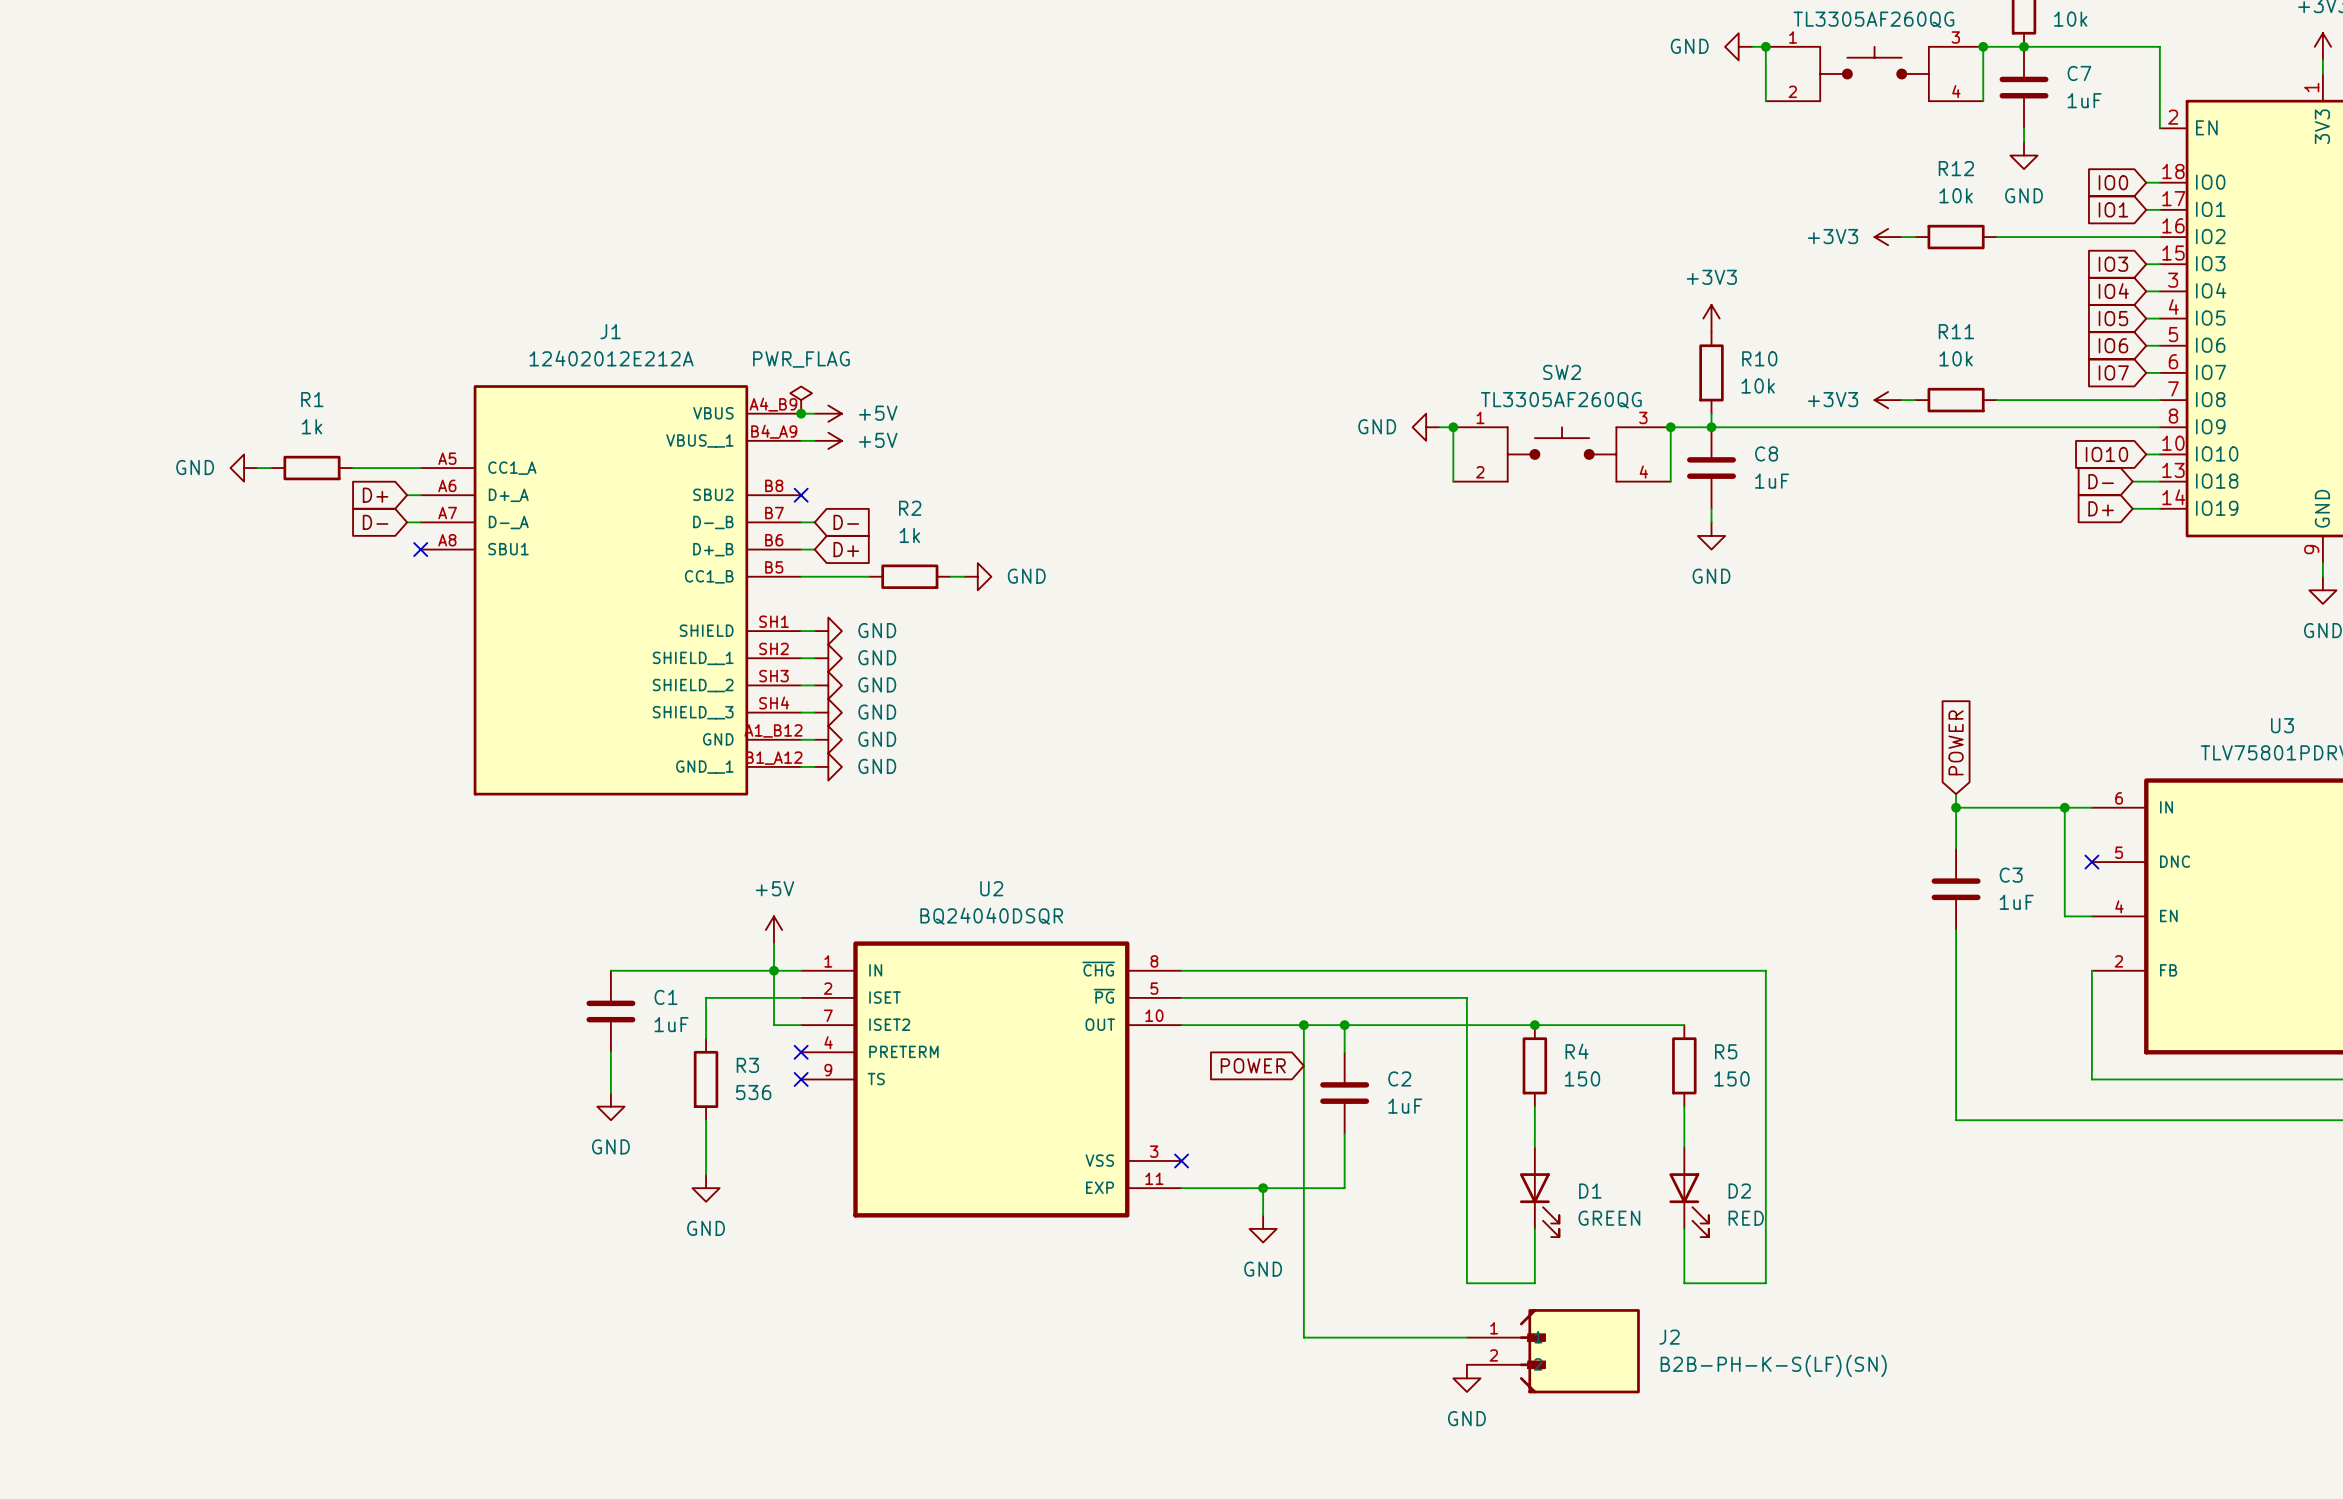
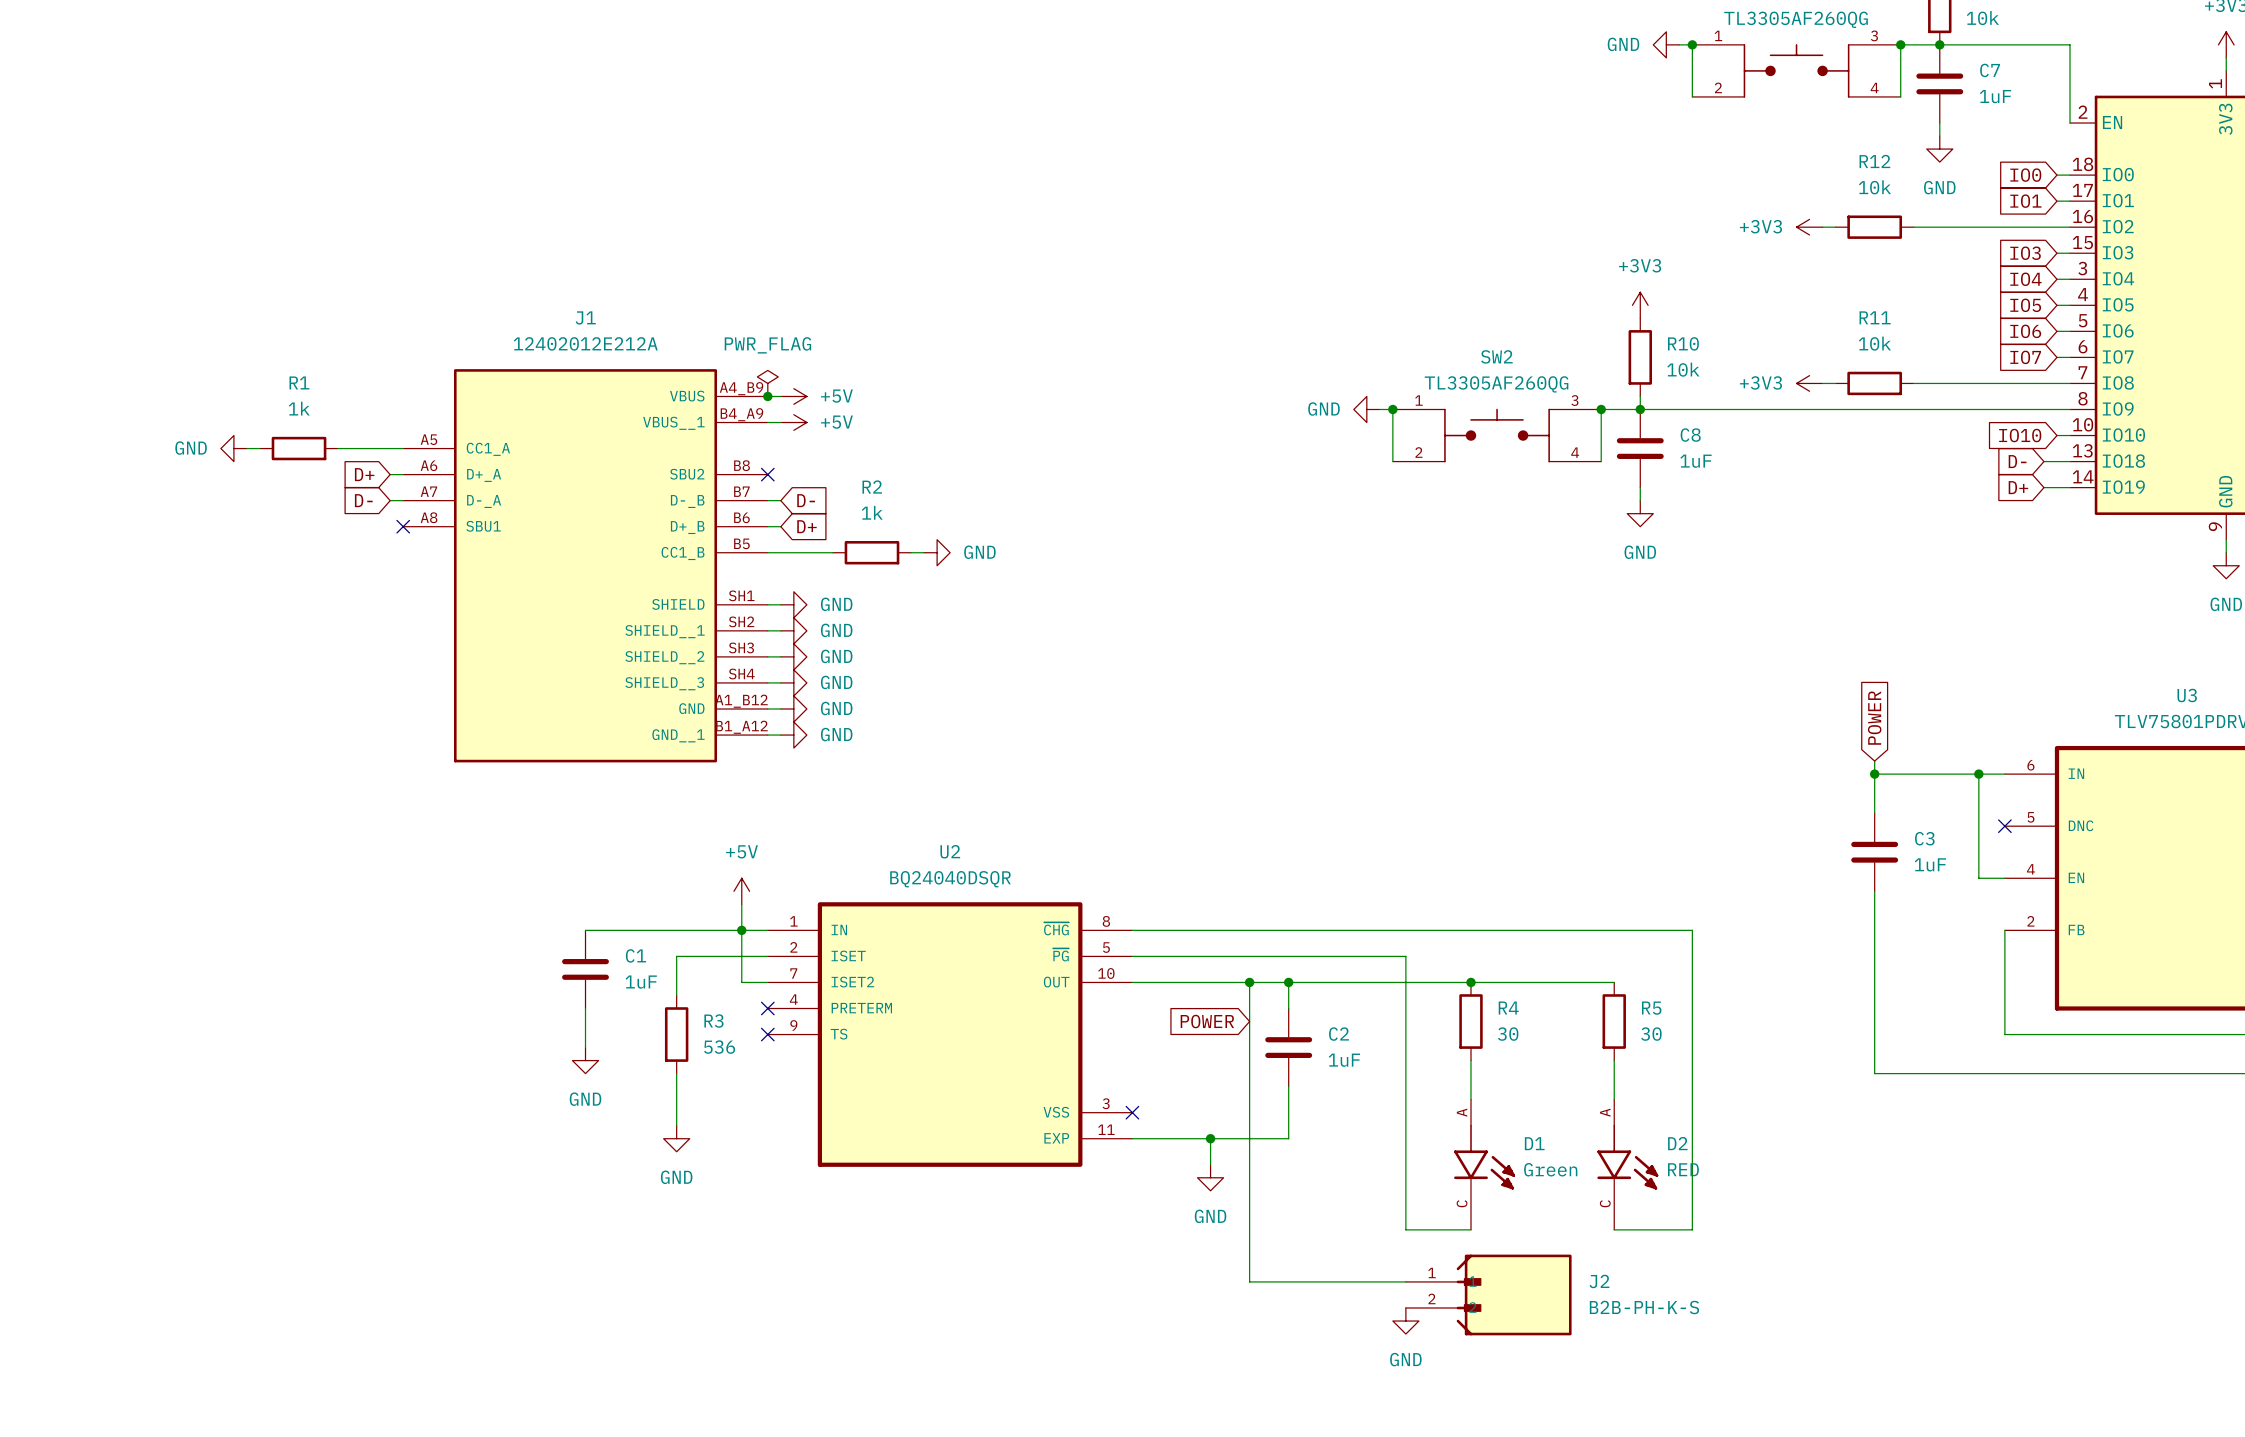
R4 value: 150 (1582, 1078) -> 30 (1508, 1034)
R5 value: 150 (1731, 1078) -> 30 (1651, 1034)
D1 symbol: [1519, 1147, 1560, 1238] -> [1454, 1099, 1516, 1230]
D2 symbol: [1669, 1147, 1709, 1238] -> [1597, 1099, 1659, 1230]
D1 value: GREEN (1609, 1218) -> Green (1550, 1169)
J2 value: B2B-PH-K-S(LF)(SN) (1773, 1365) -> B2B-PH-K-S (1644, 1307)

